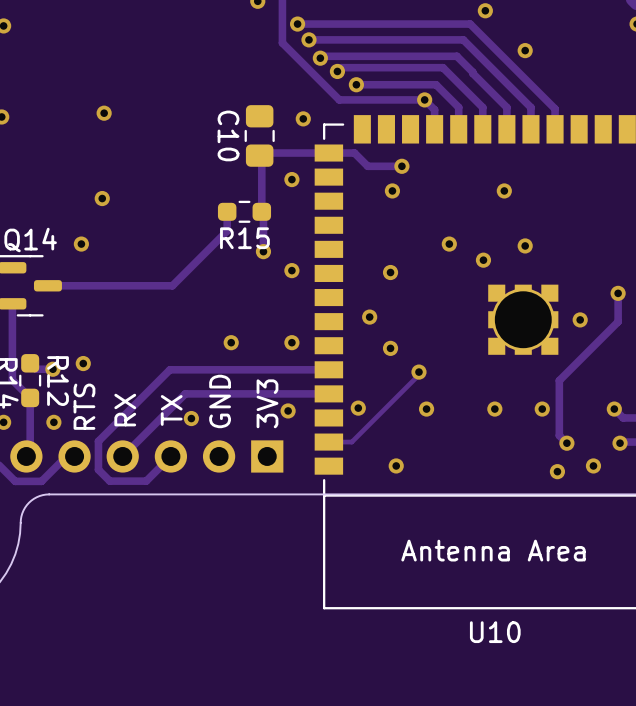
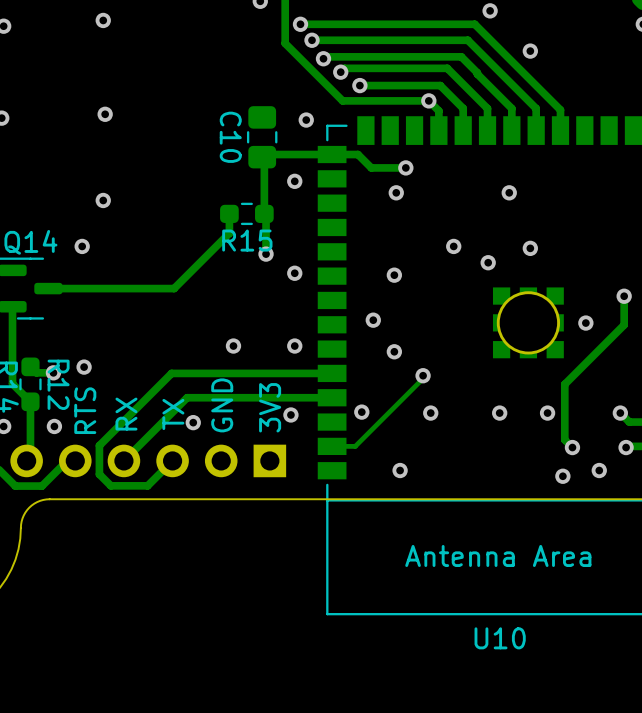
via: none -> (103, 20)

